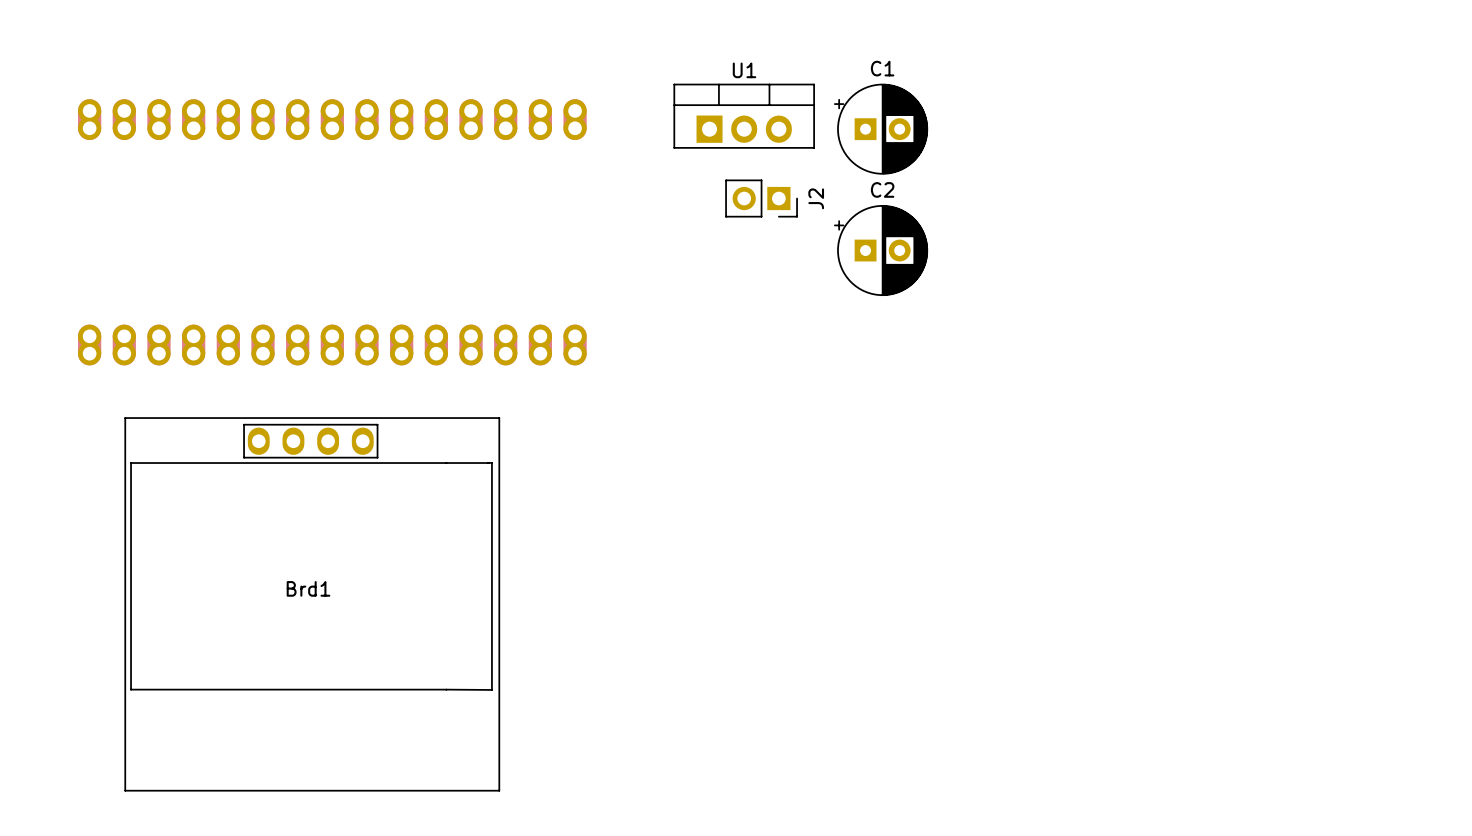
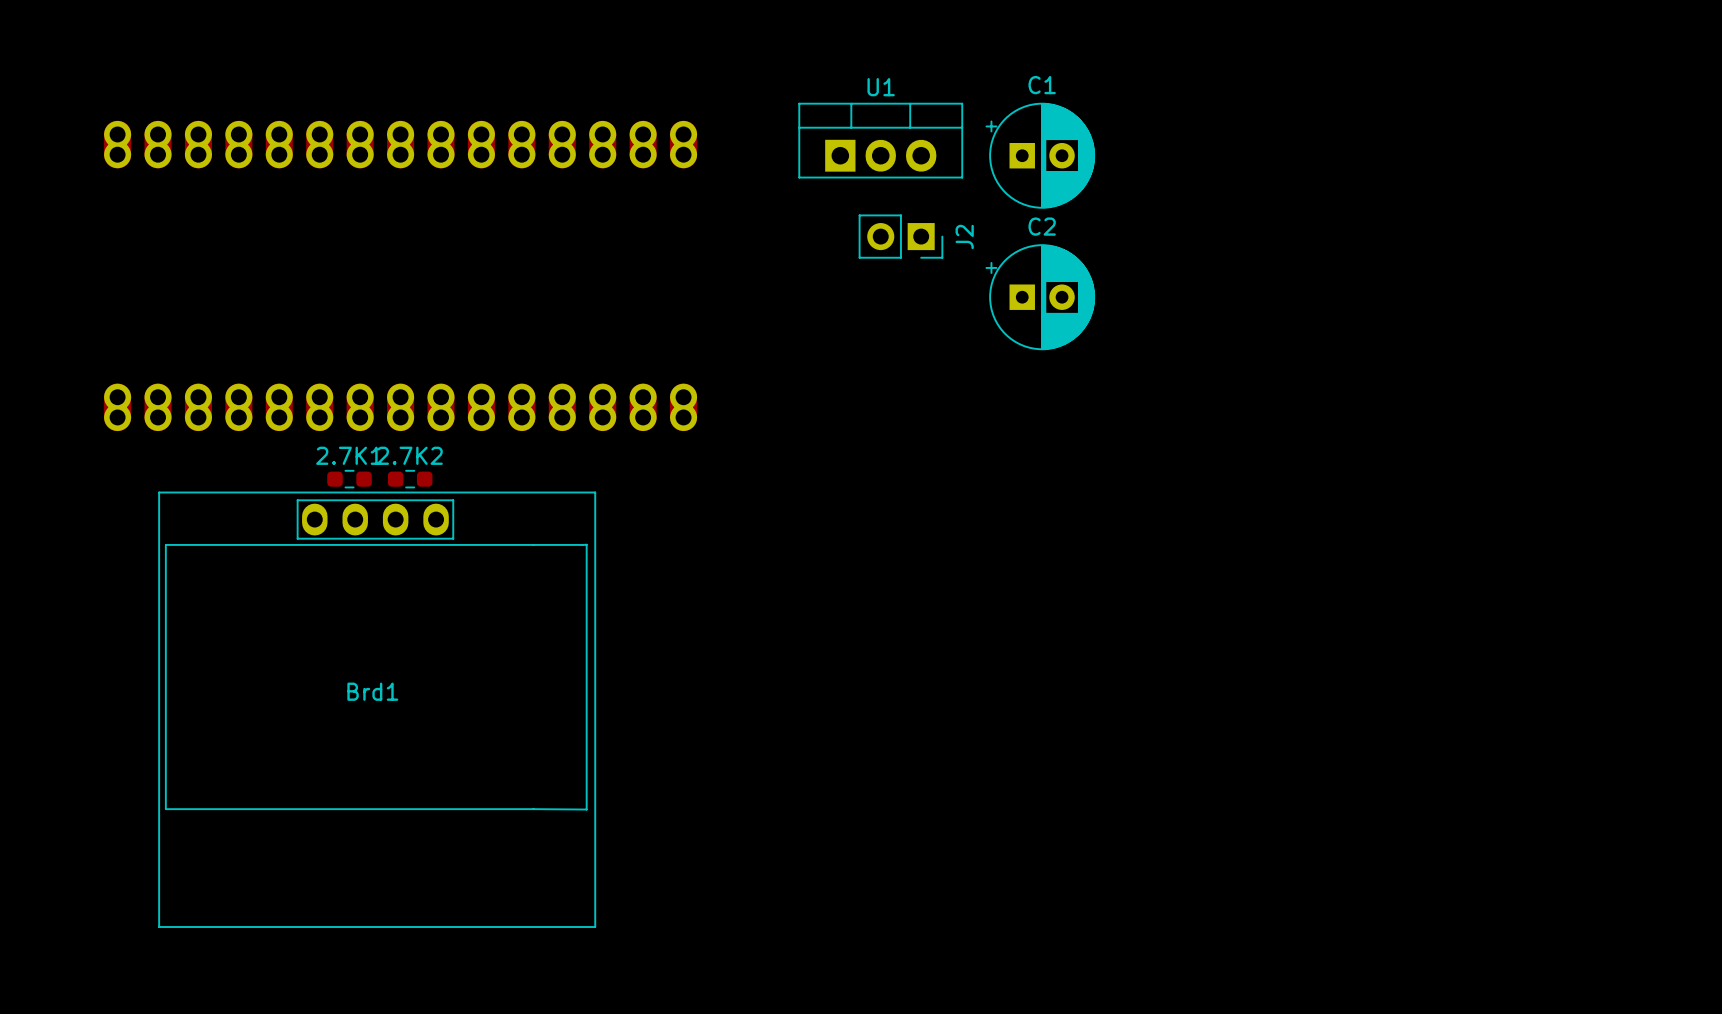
2.7K1: none -> (349, 479)
2.7K2: none -> (410, 479)

